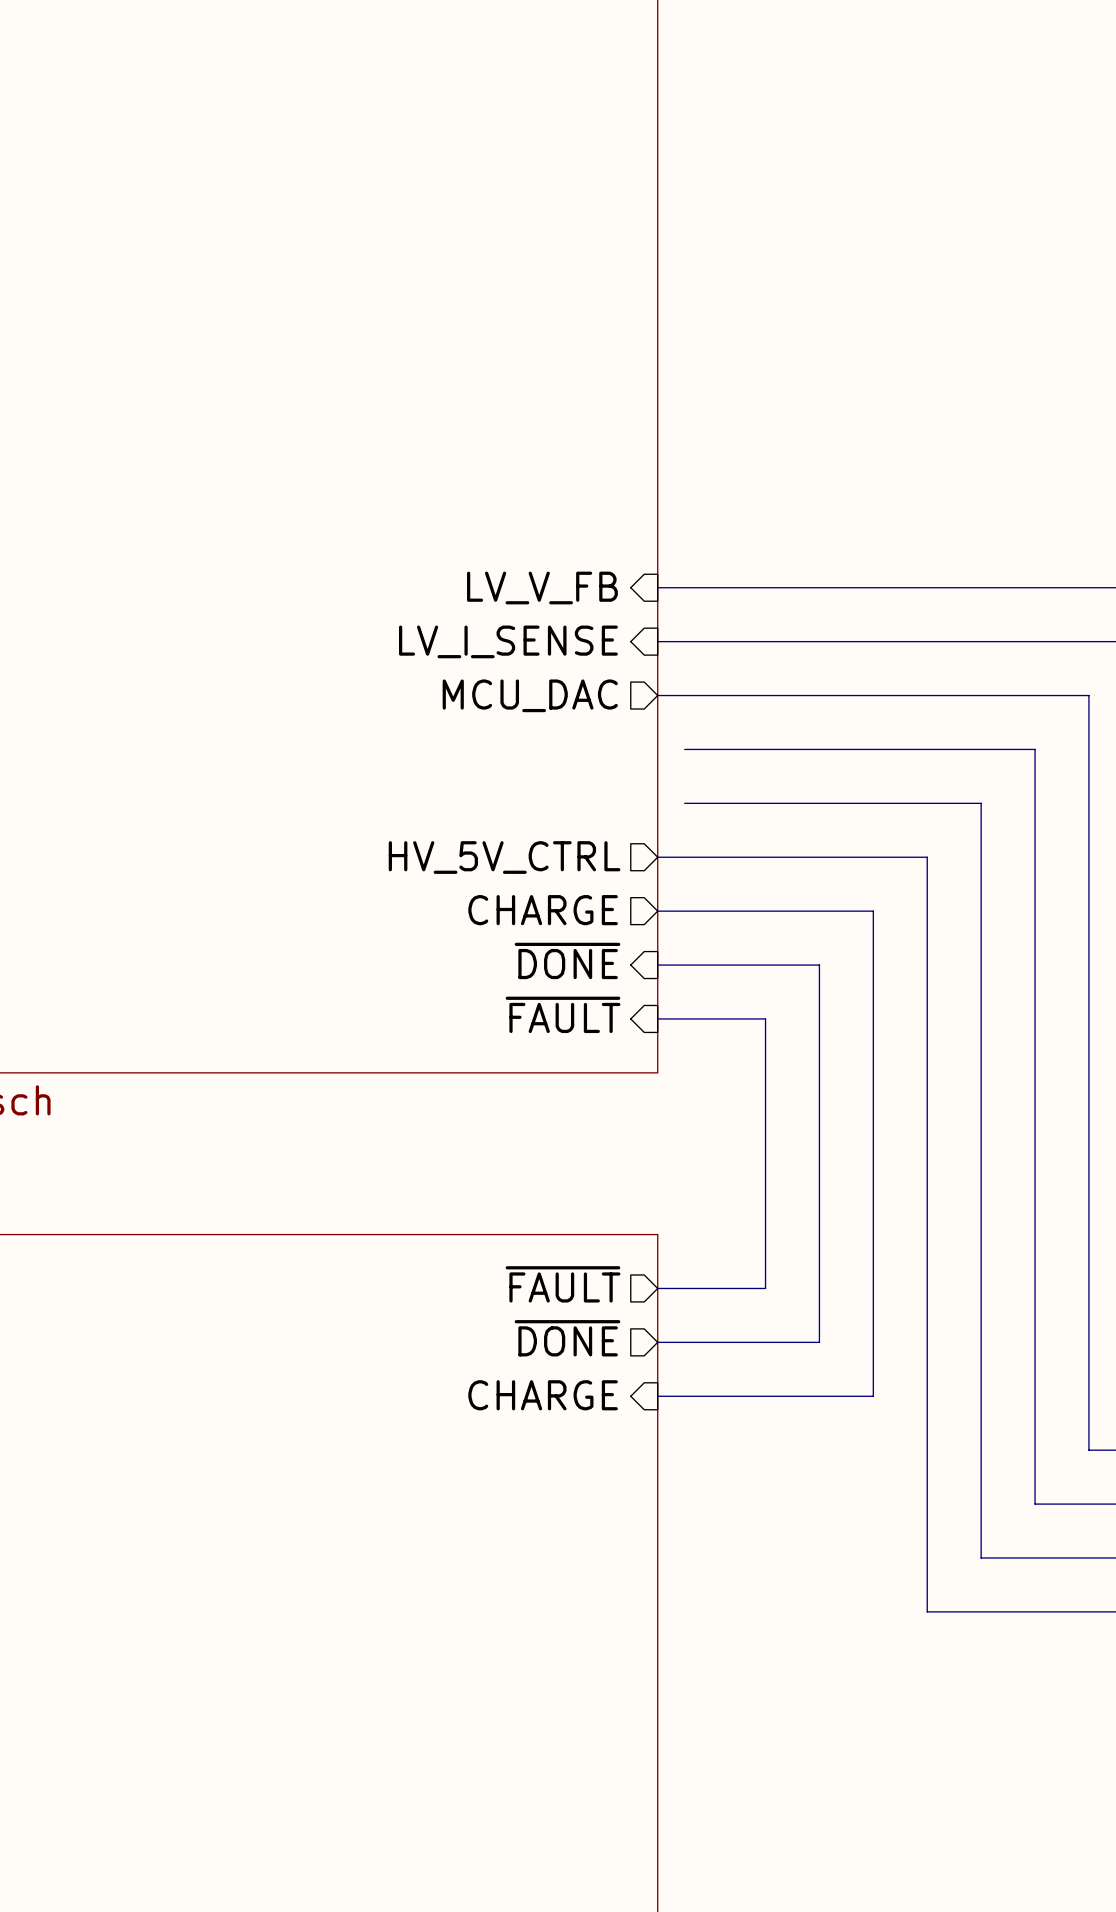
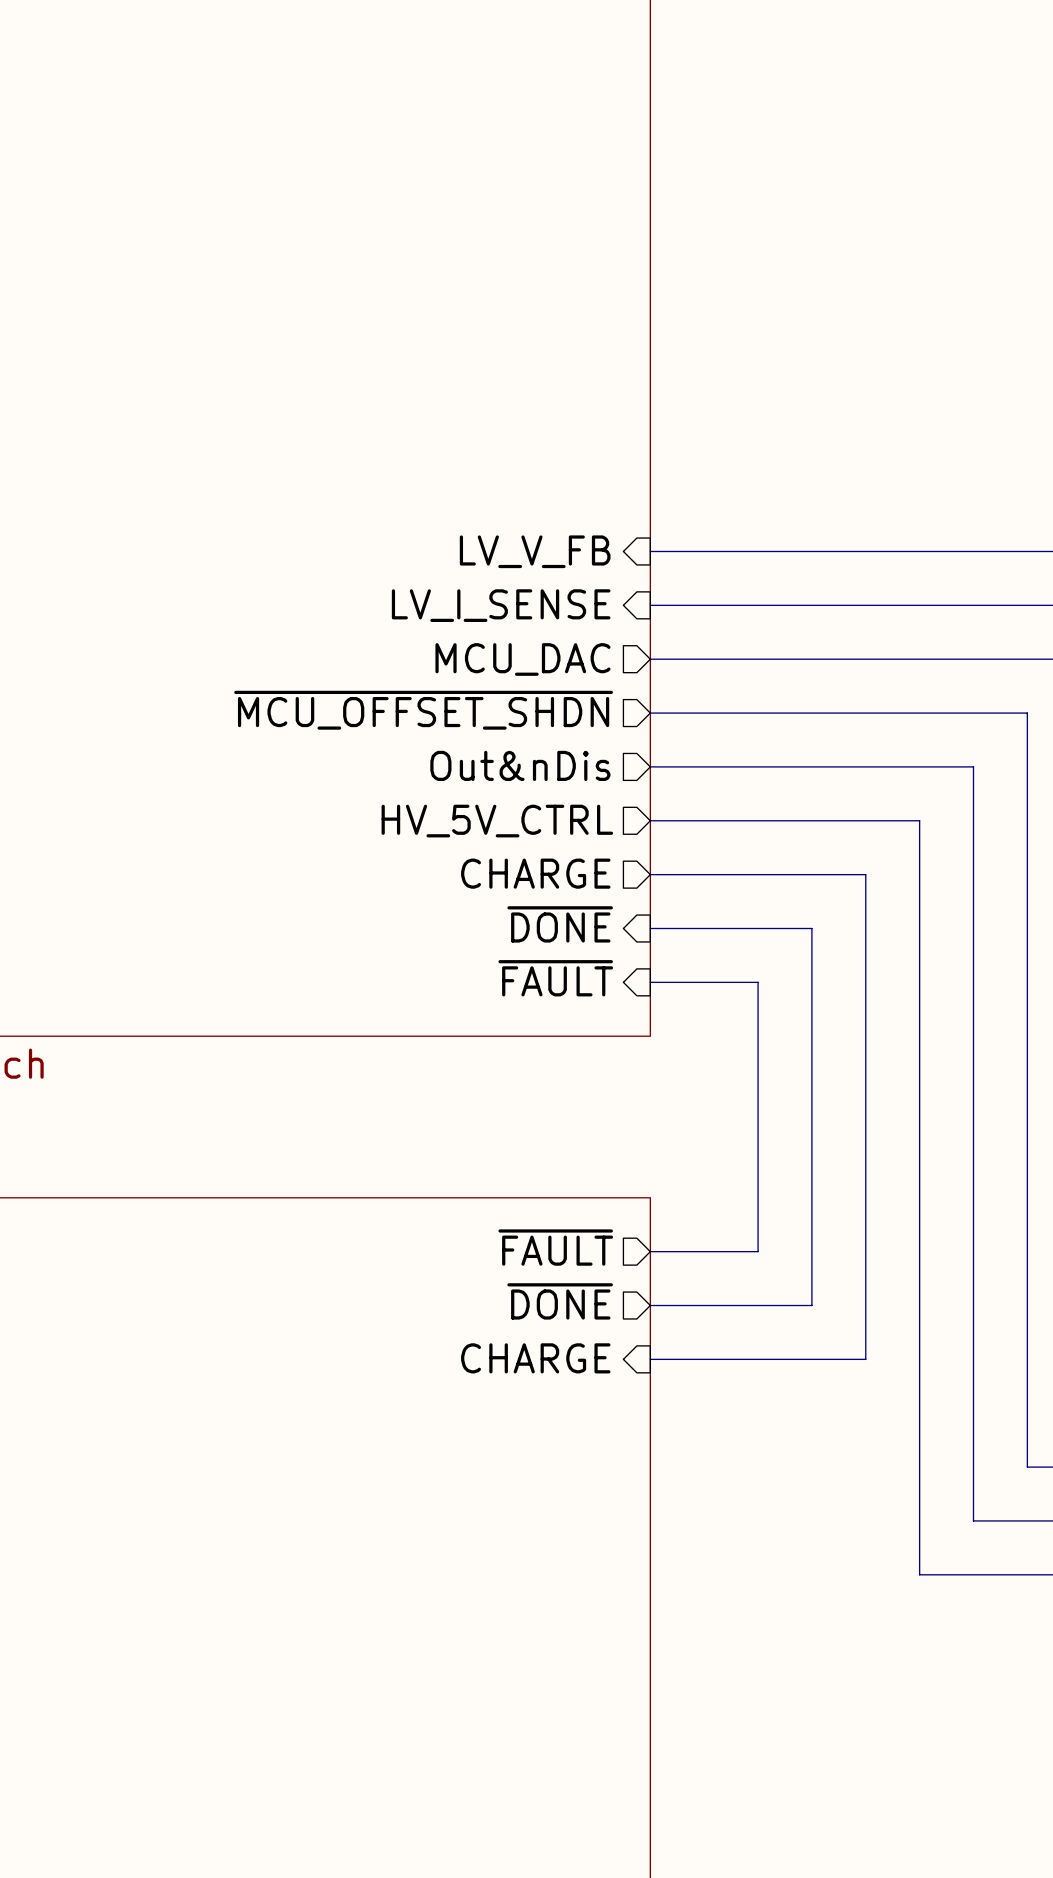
sheet pin: none -> ~{MCU_OFFSET_SHDN} (423, 710)
wire: none -> (650, 713) (677, 713)
sheet pin: none -> Out&nDis (520, 765)
wire: none -> (650, 766) (677, 766)

